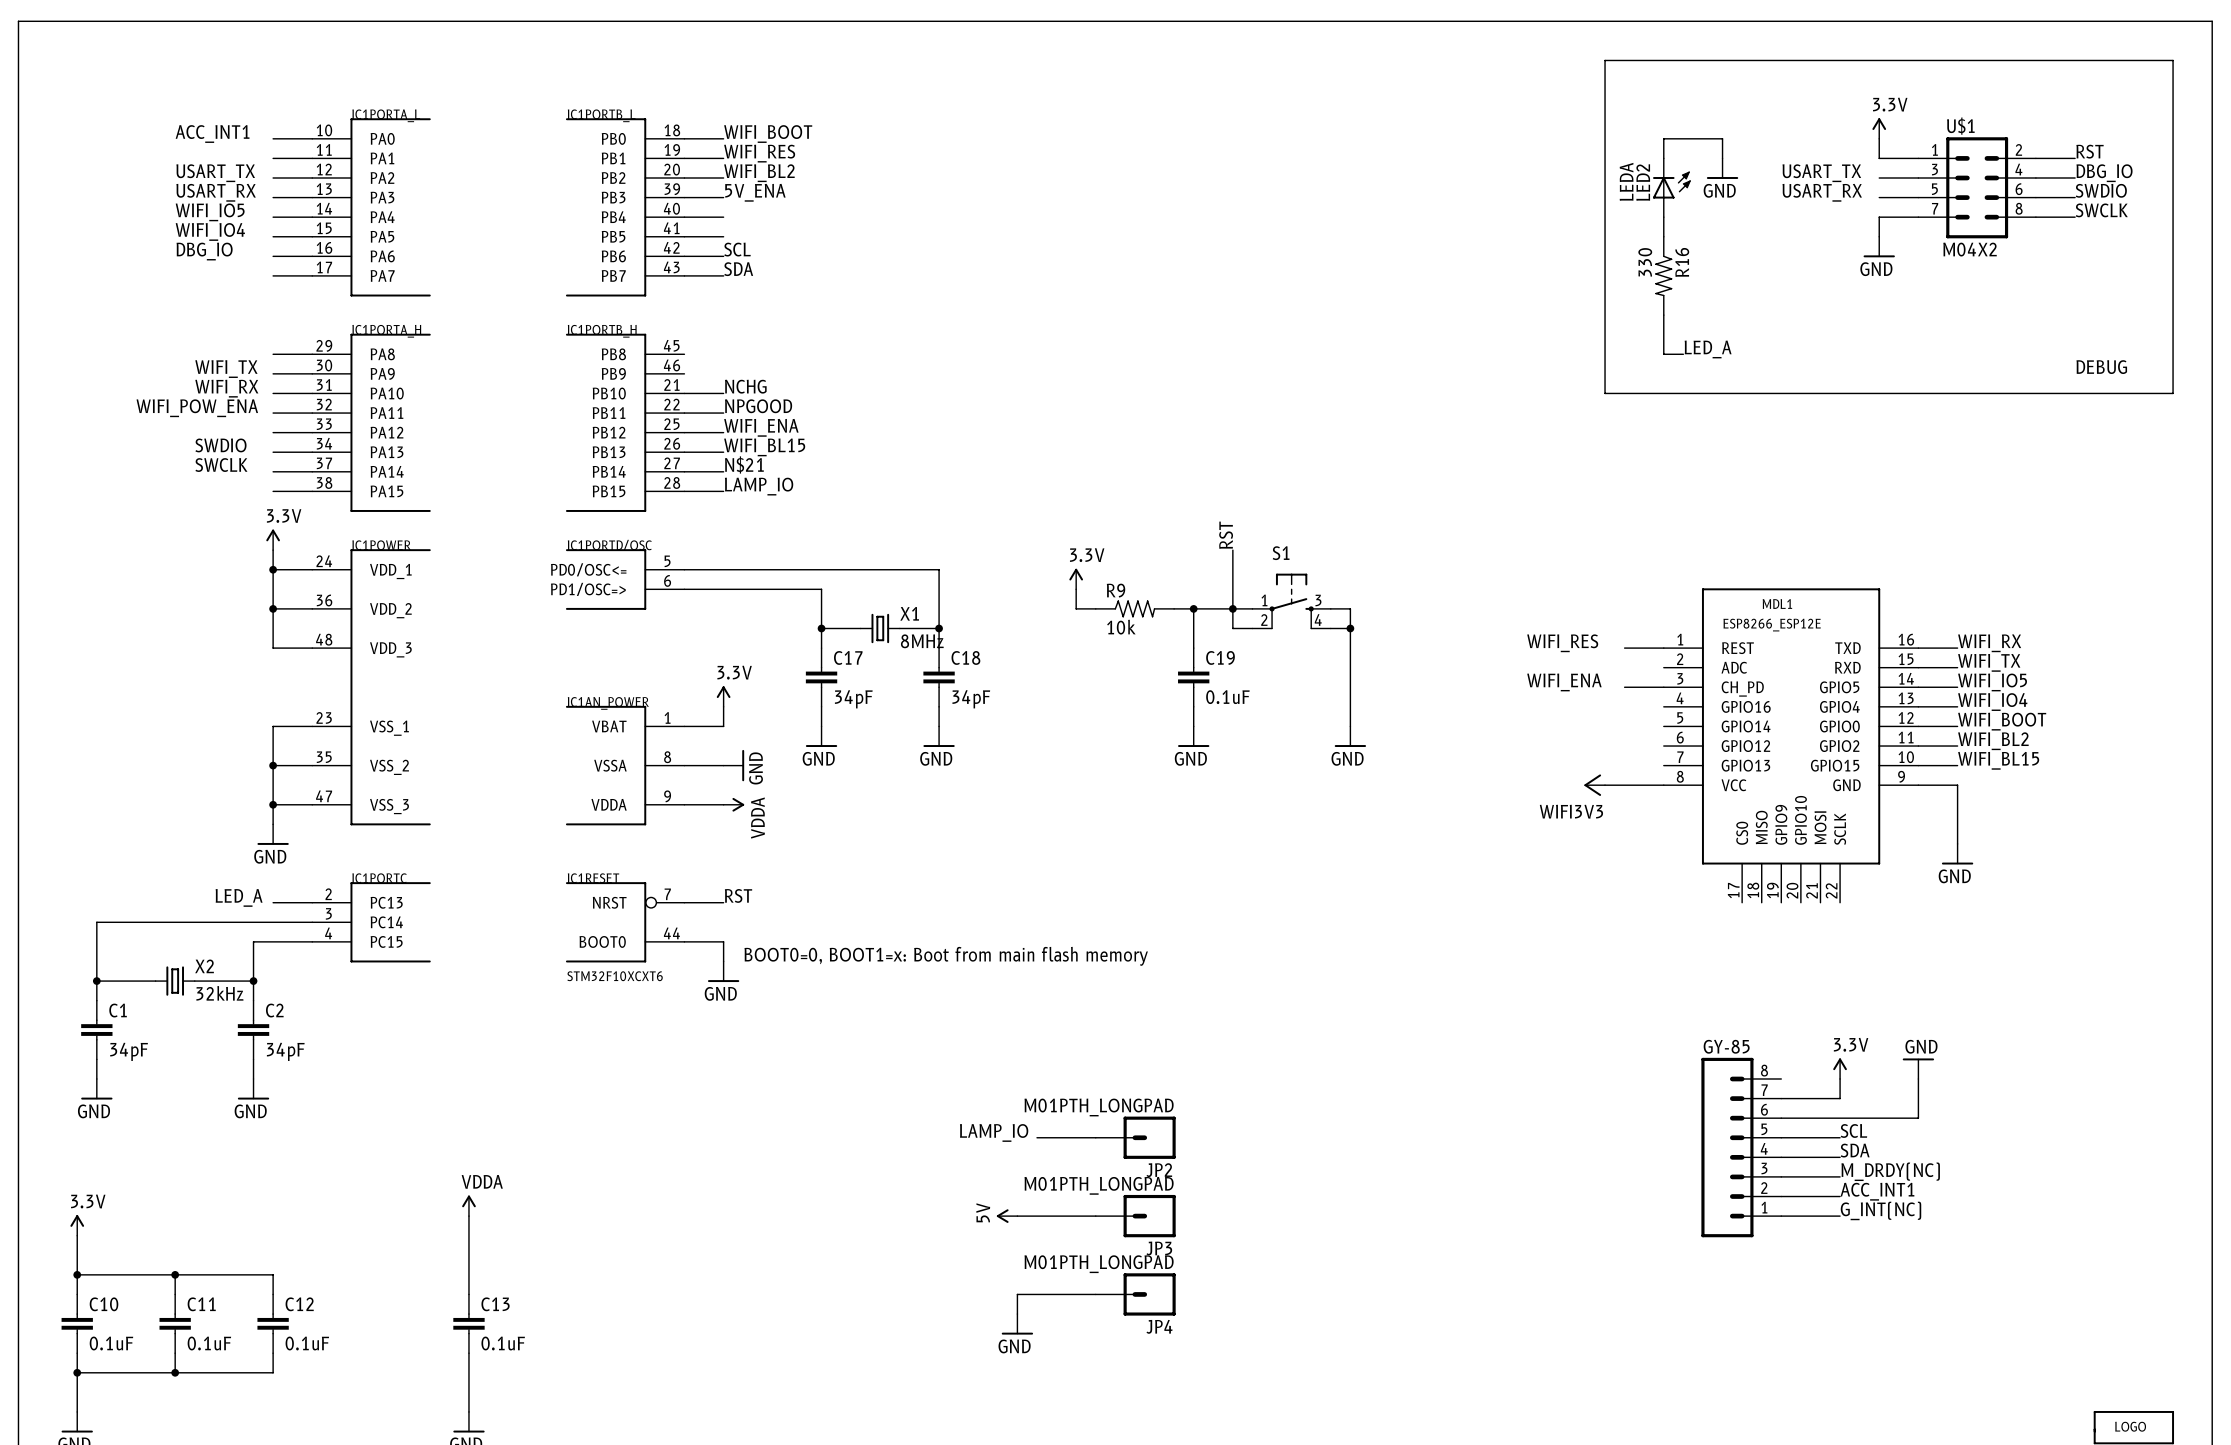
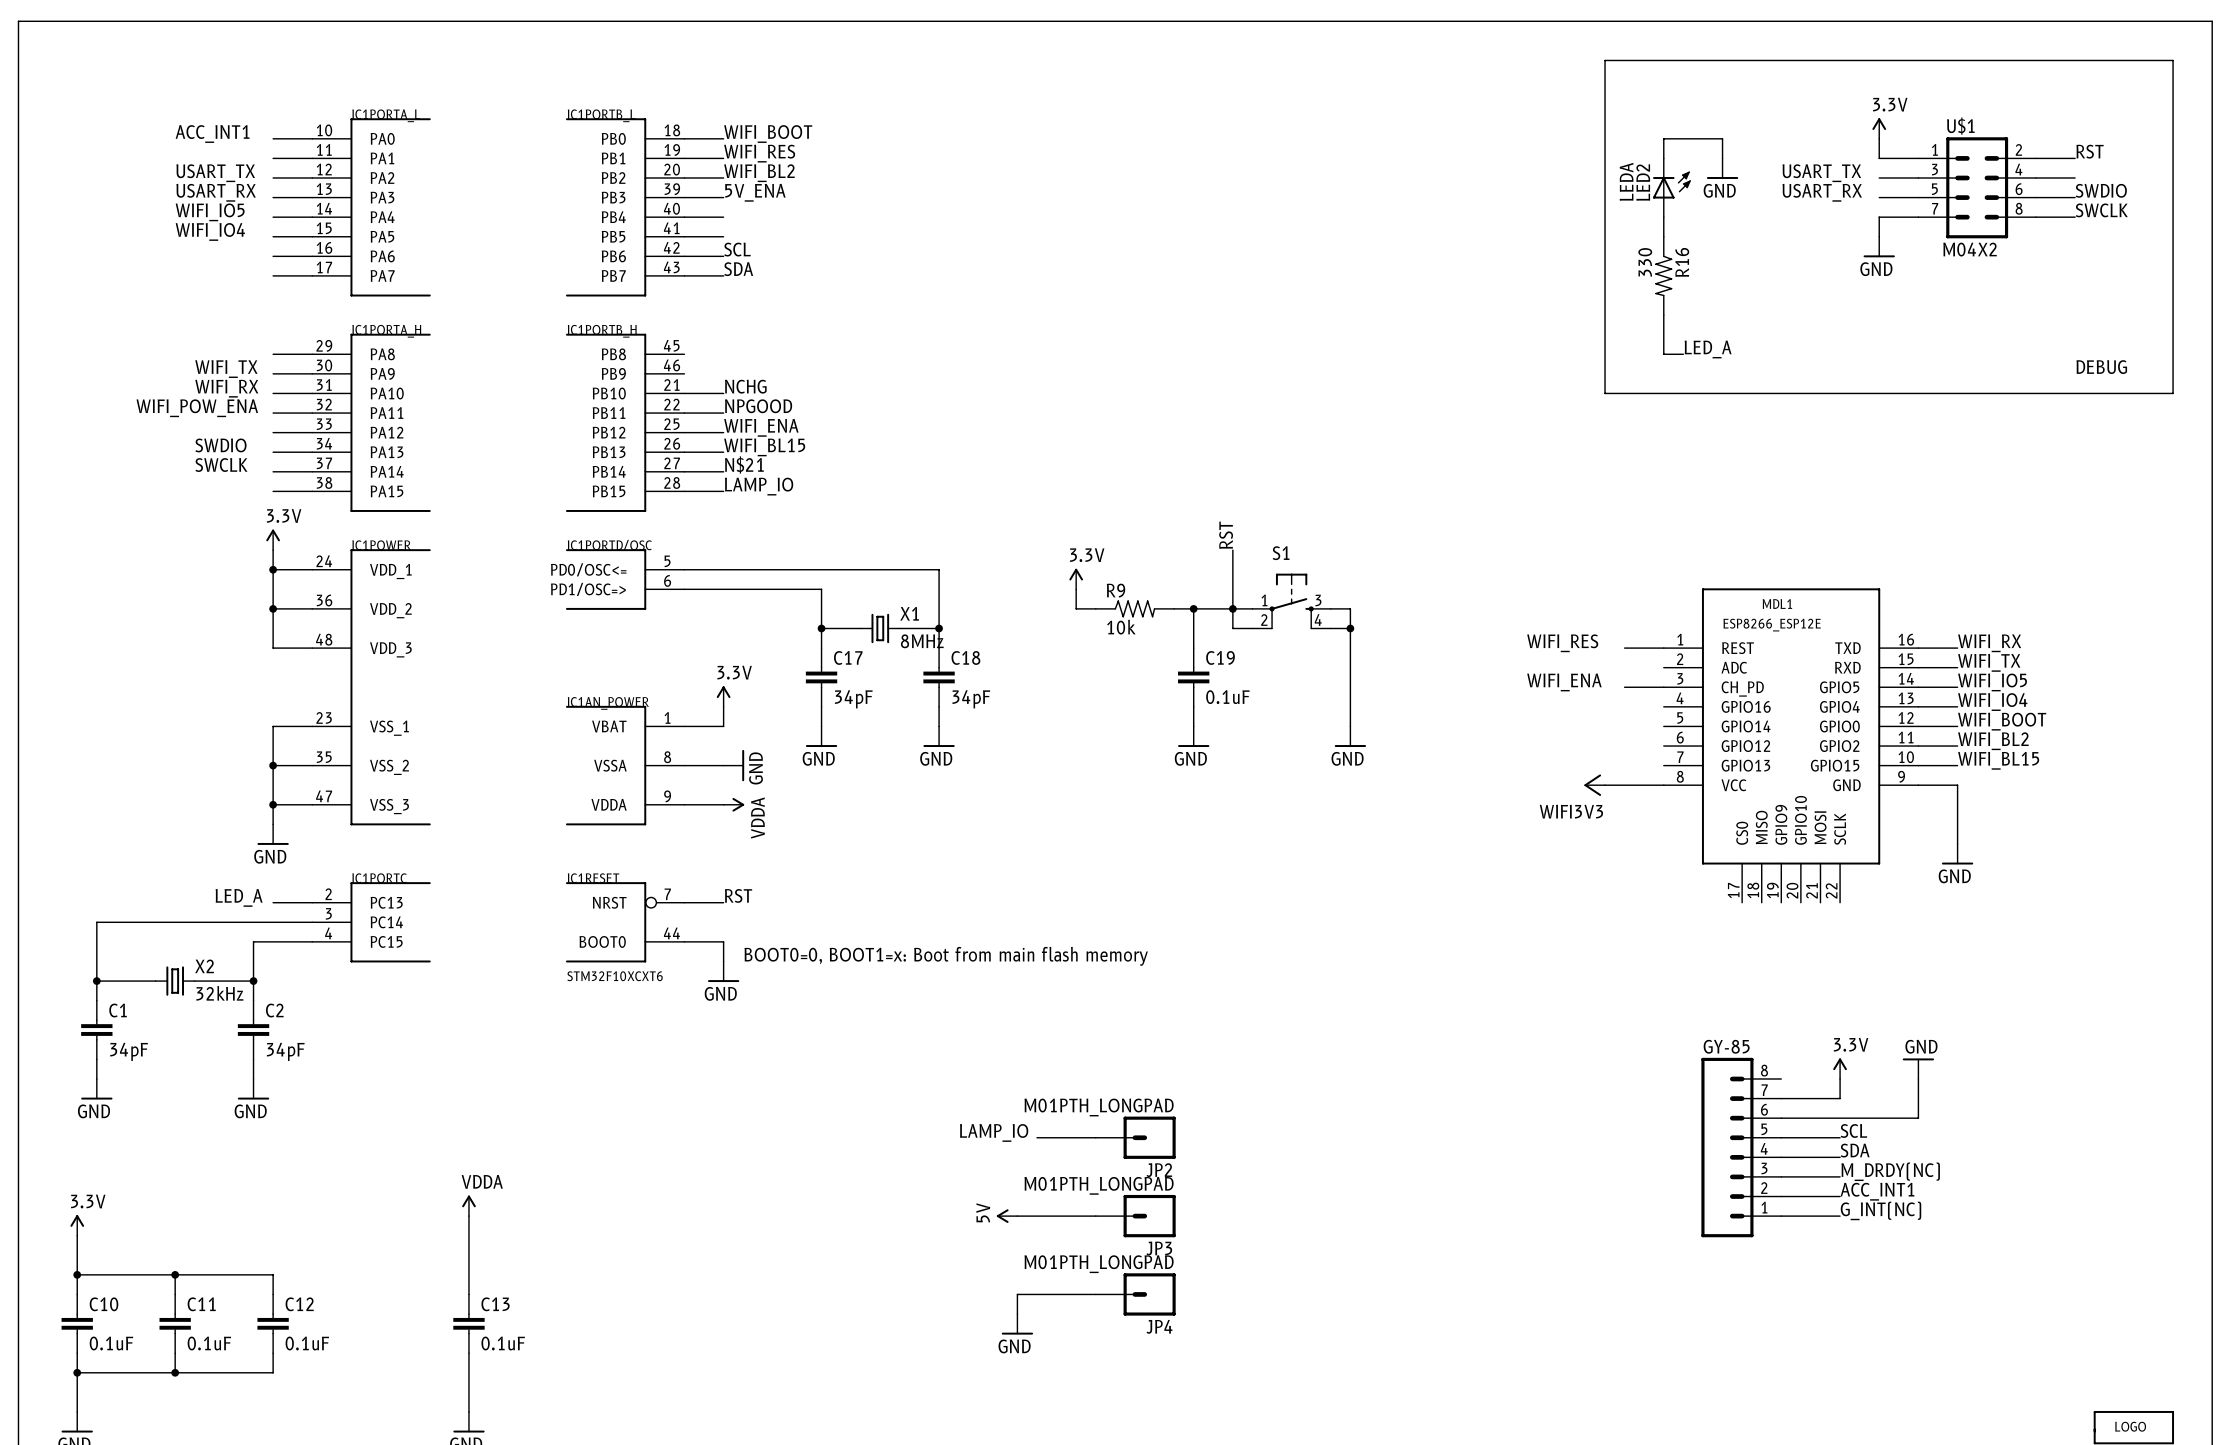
label: DBG_IO (2104, 173) -> none
label: DBG_IO (204, 251) -> none

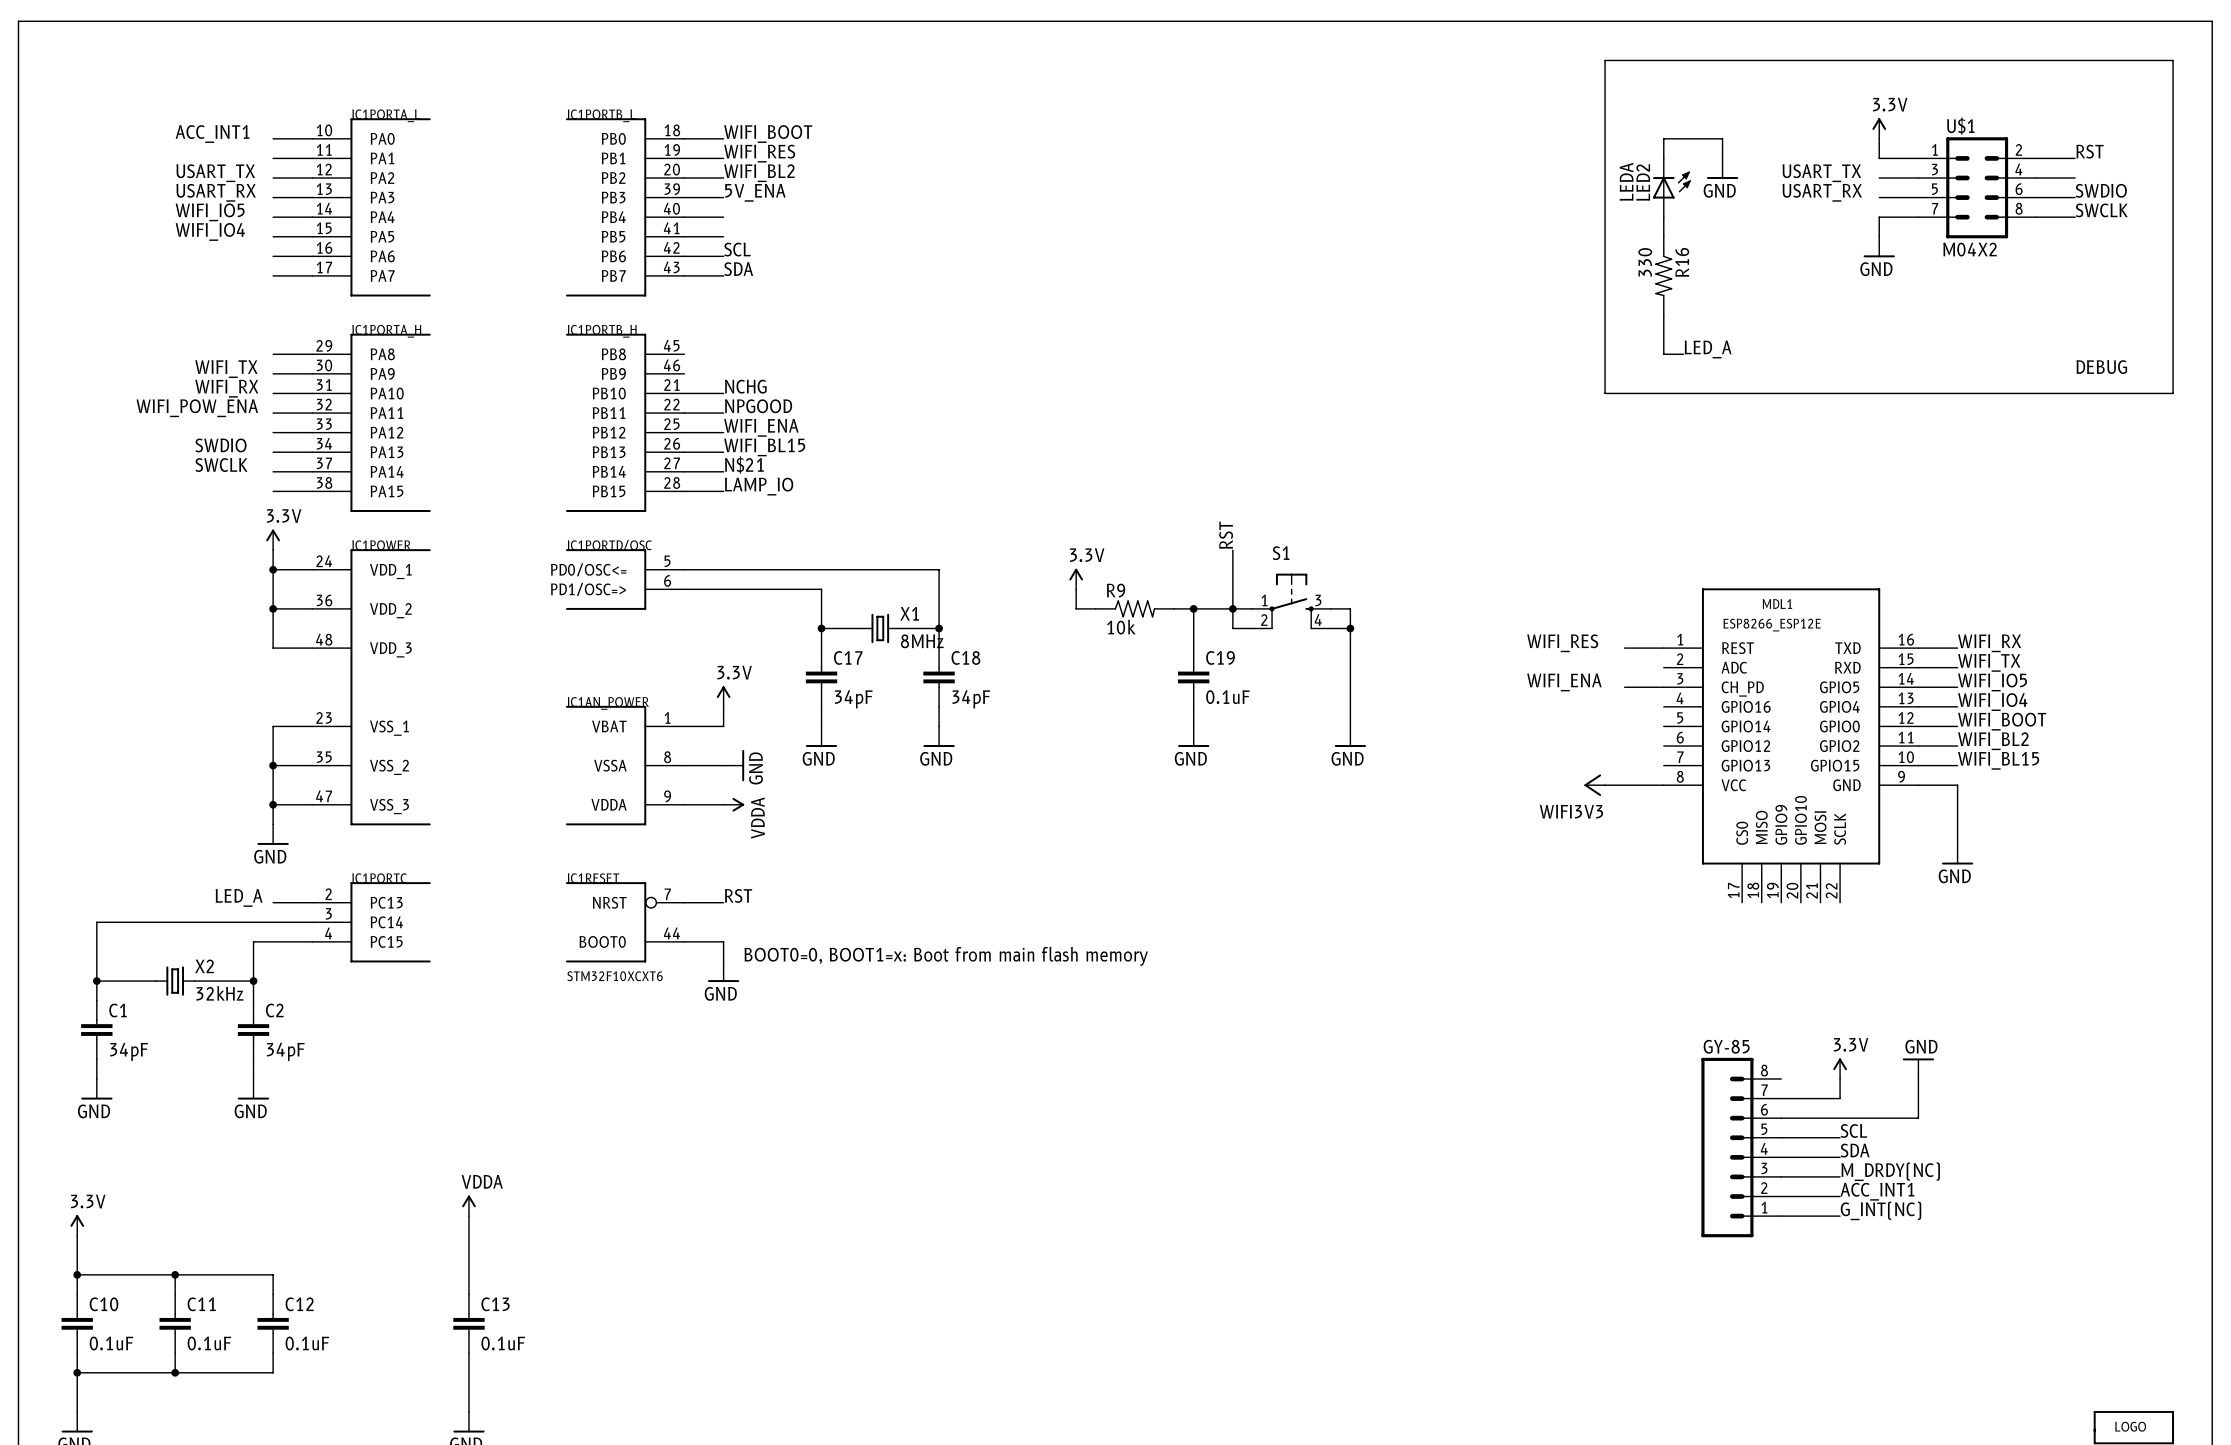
label: LAMP_IO (994, 1132) -> none
wire: (1037, 1137) (1095, 1137) -> none
JP2: M01PTH_LONGPAD (1135, 1137) -> none
power symbol: 5V (1007, 1216) -> none
wire: (1017, 1216) (1095, 1216) -> none
JP3: M01PTH_LONGPAD (1135, 1216) -> none
wire: (1095, 1294) (1017, 1294) (1017, 1314) -> none
JP4: M01PTH_LONGPAD (1135, 1294) -> none
power symbol: GND (1017, 1324) -> none

